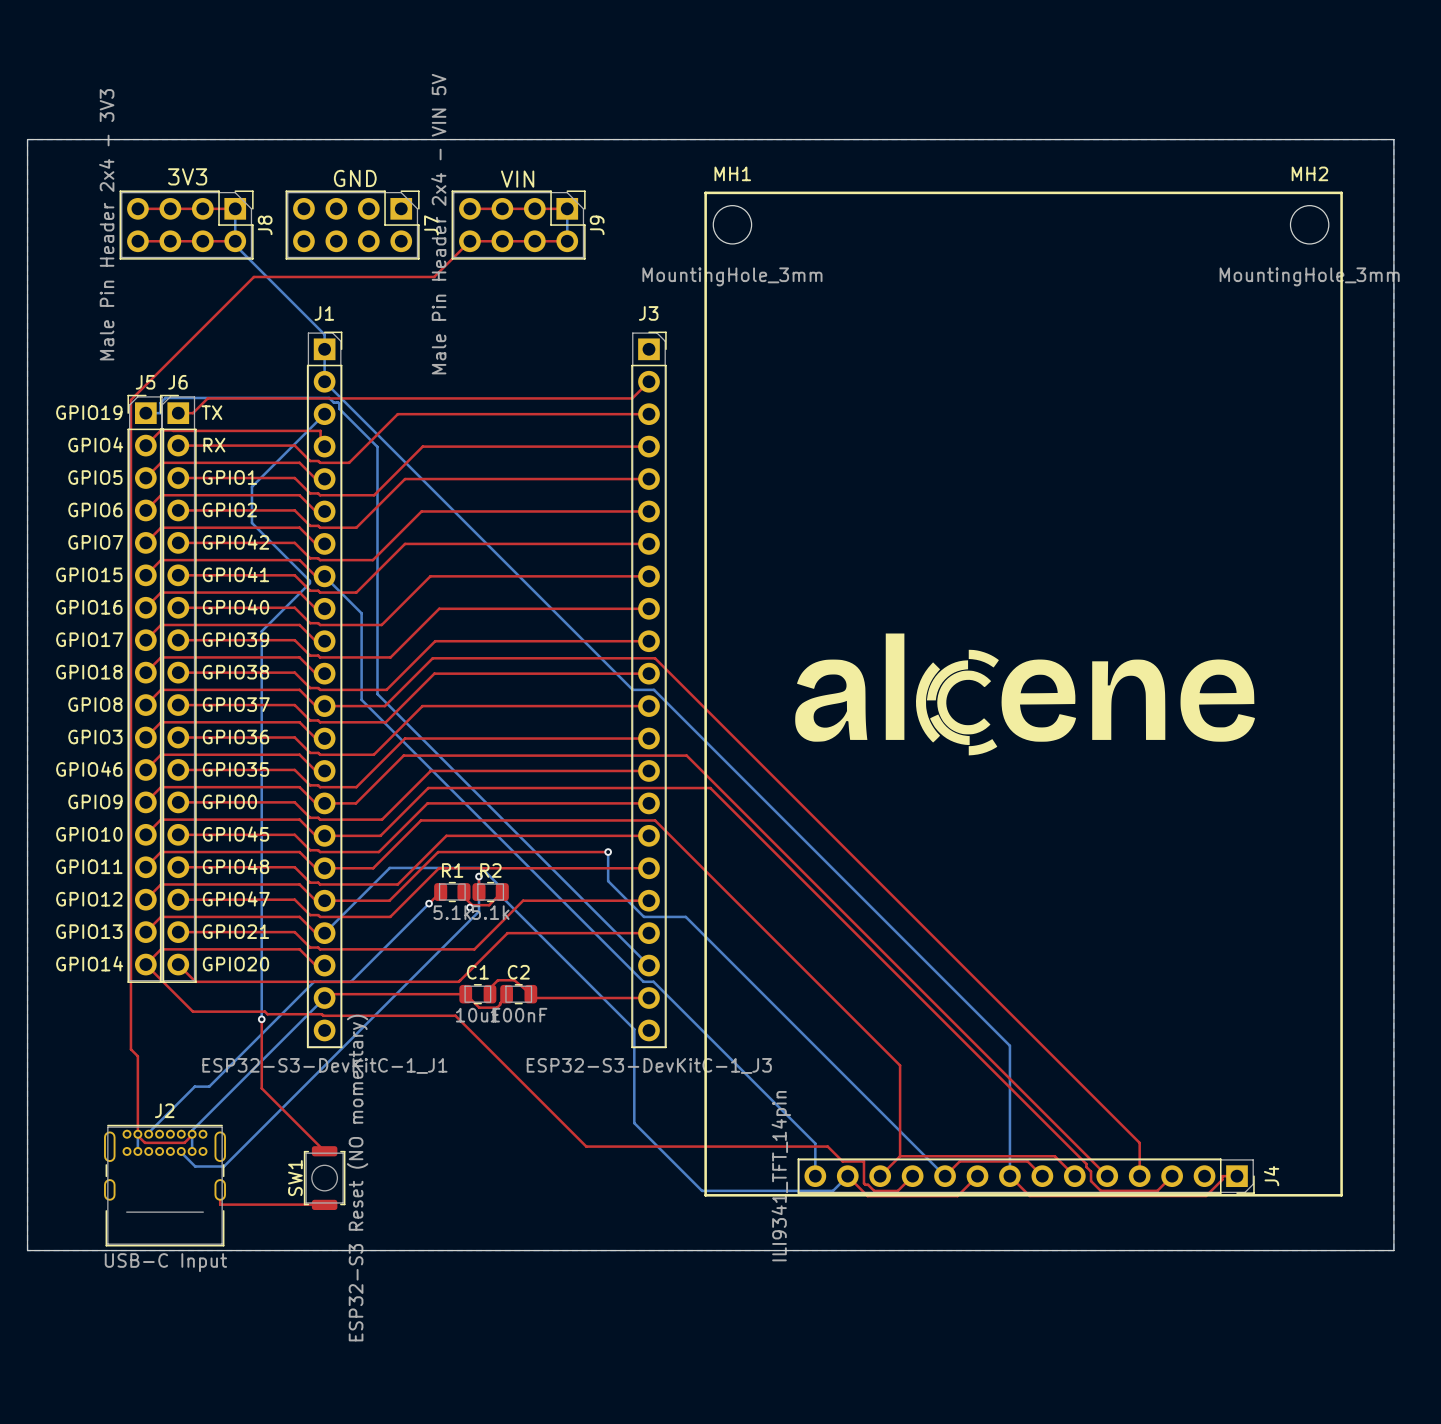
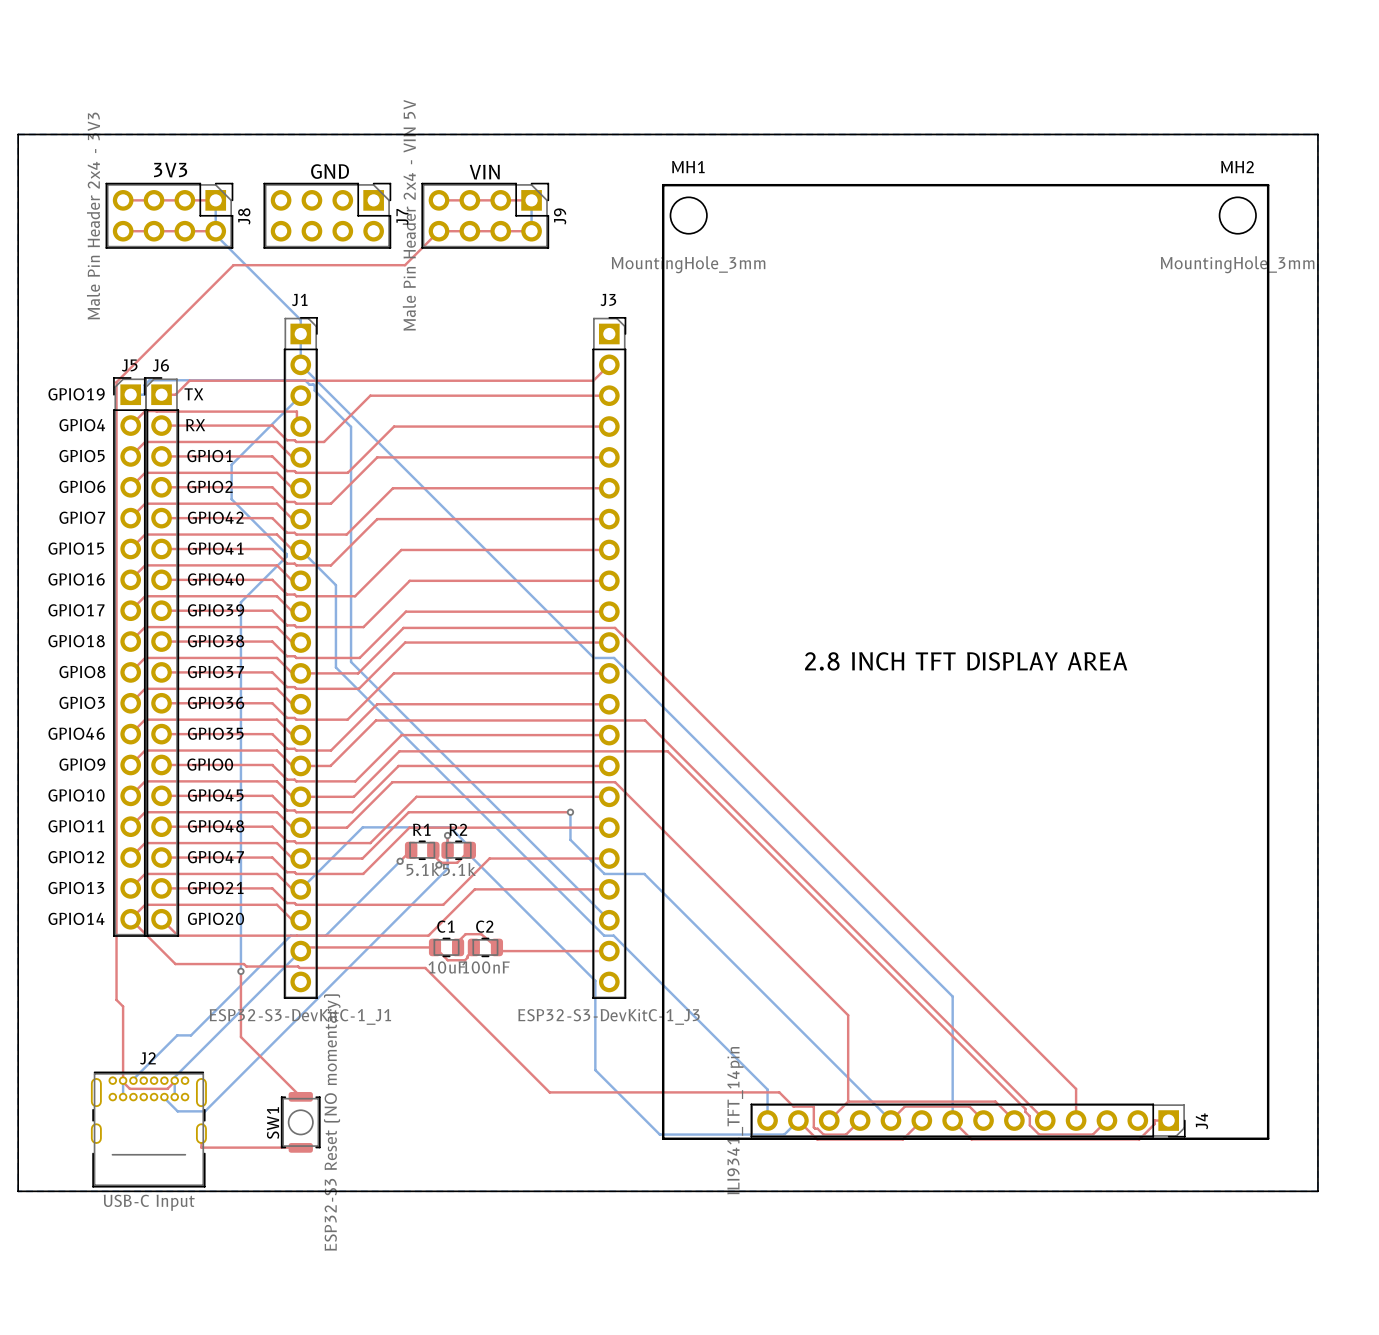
drawing: [885, 633, 1077, 756] -> none
drawing: [795, 659, 868, 742] -> none
drawing: [1092, 659, 1255, 742] -> none
text: none -> 2.8 INCH TFT DISPLAY AREA (966, 661)

